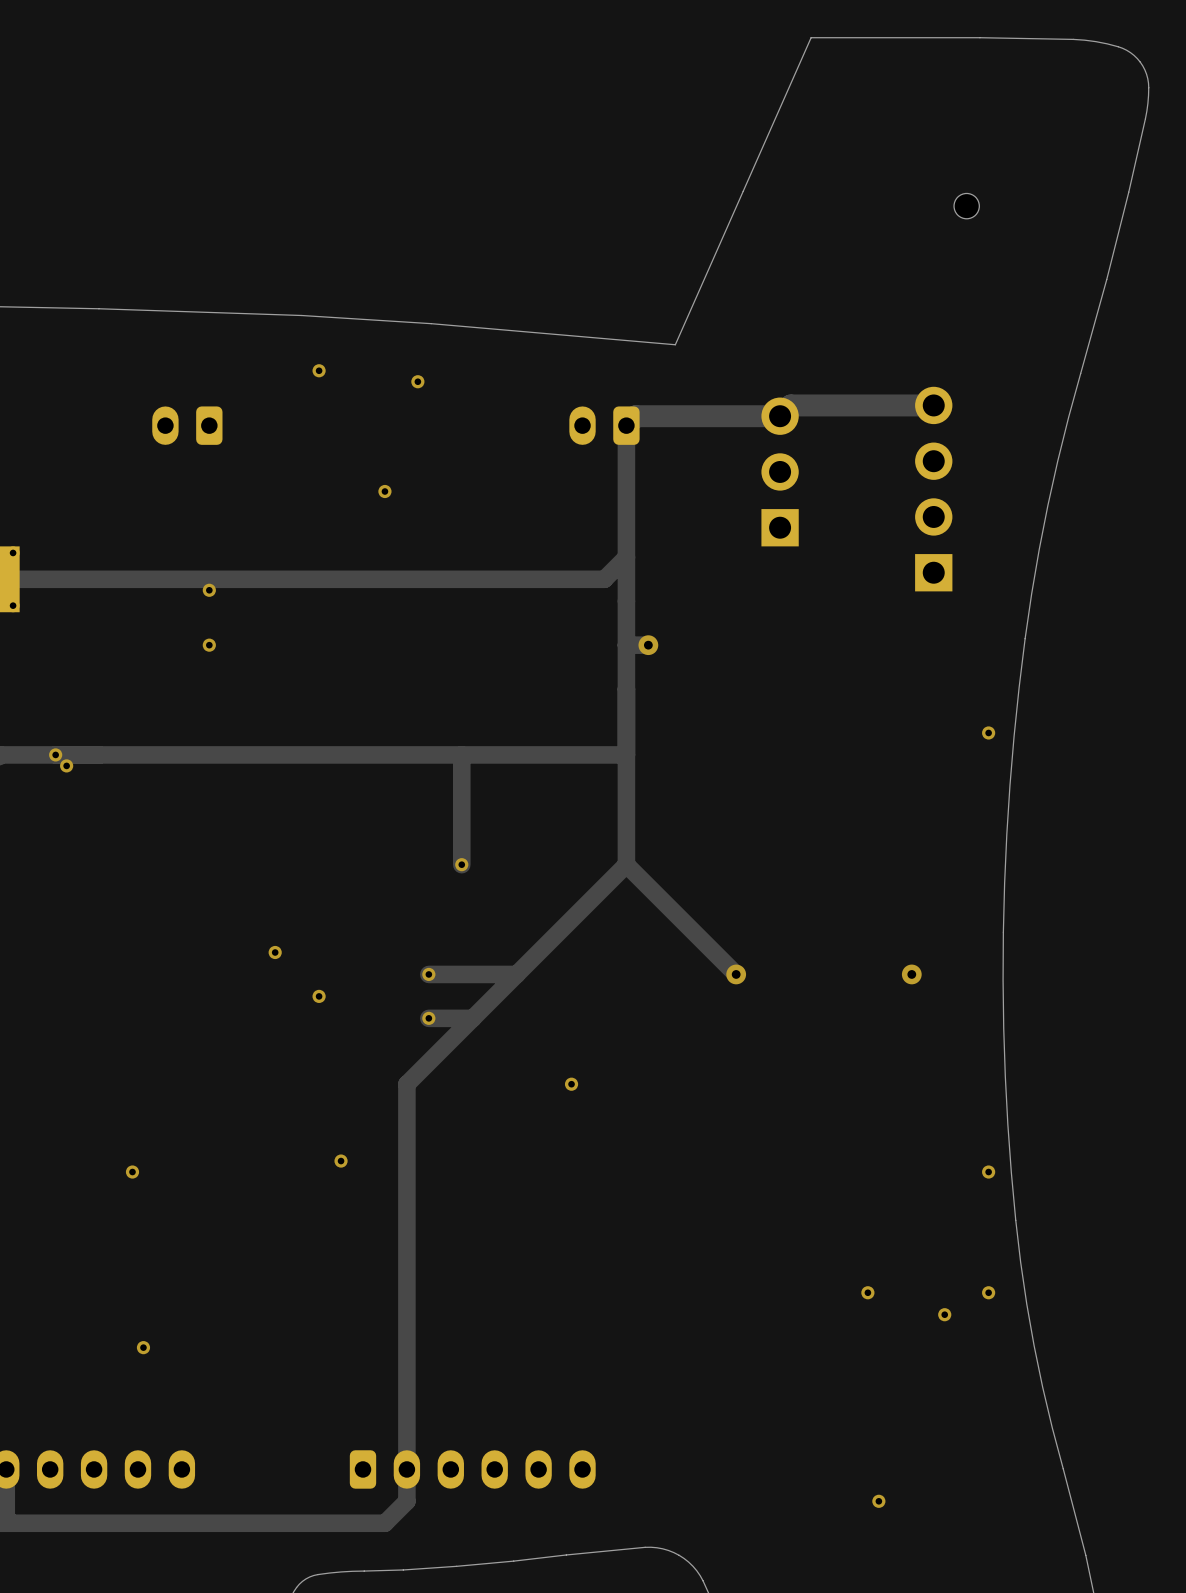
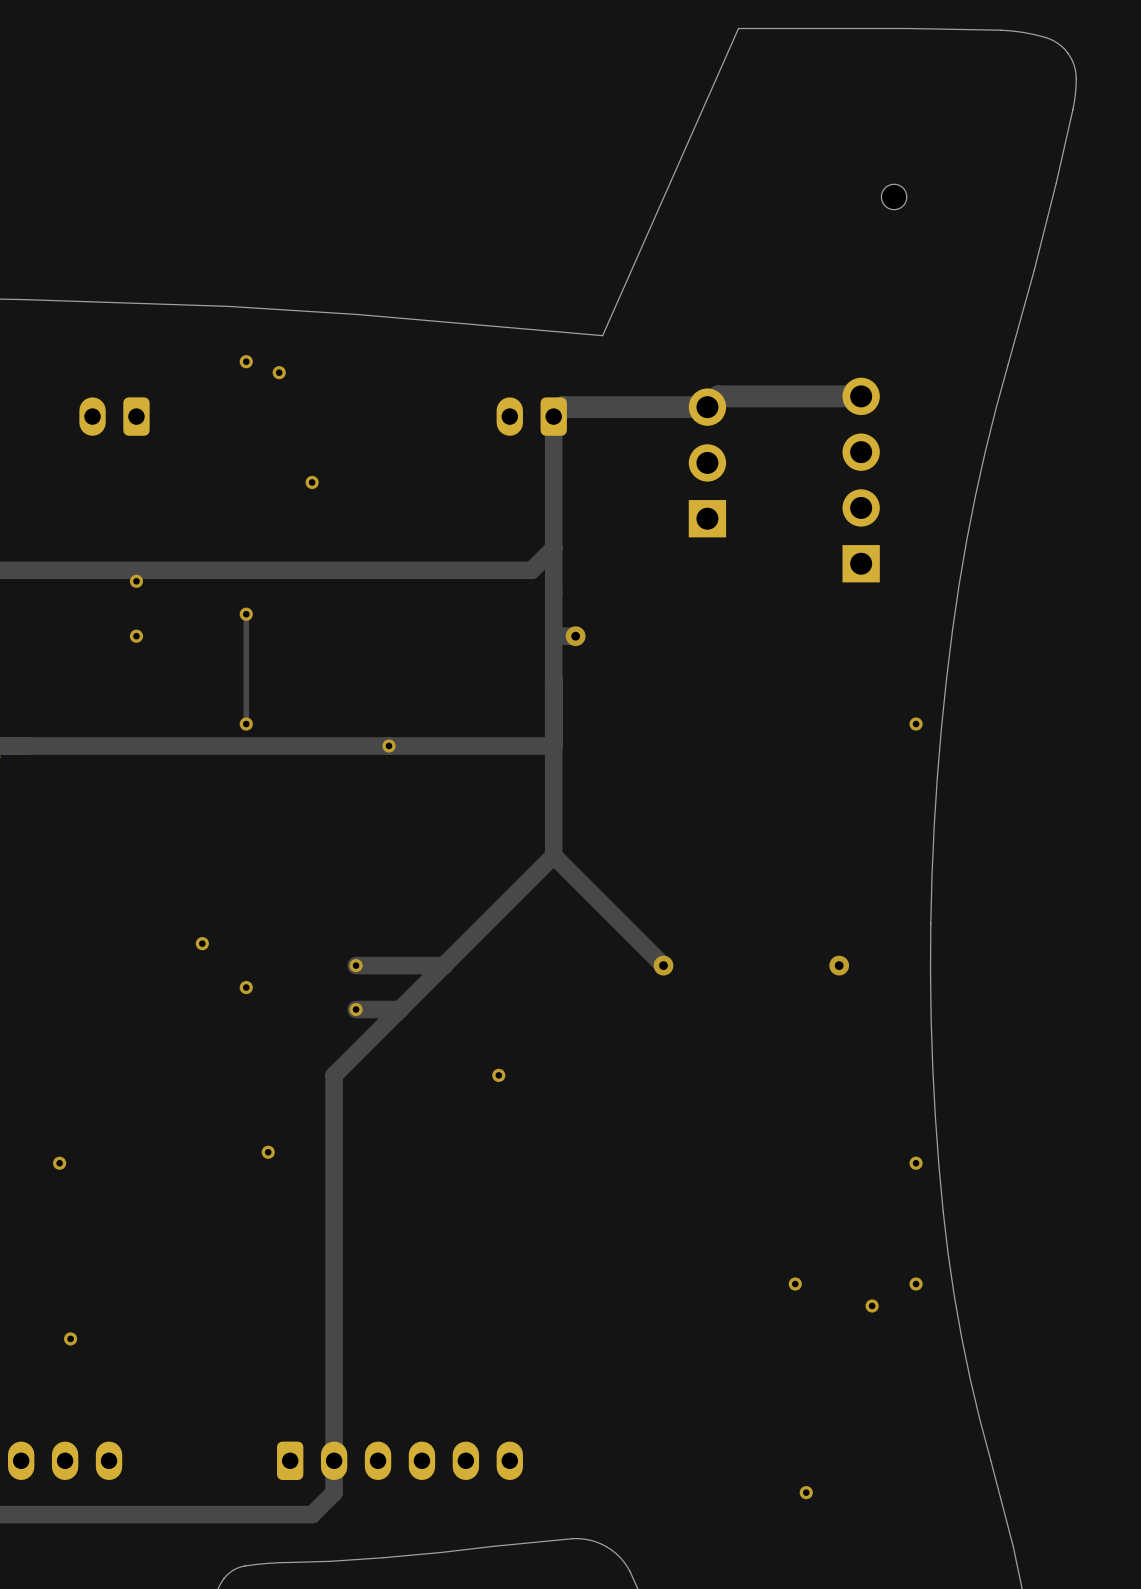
via position: (417, 381) -> (279, 372)
via: none -> (246, 614)
via: none -> (246, 724)
track: (461, 754) (461, 864) -> (246, 614) (246, 724)
via: none -> (389, 745)
via: (461, 864) -> none

